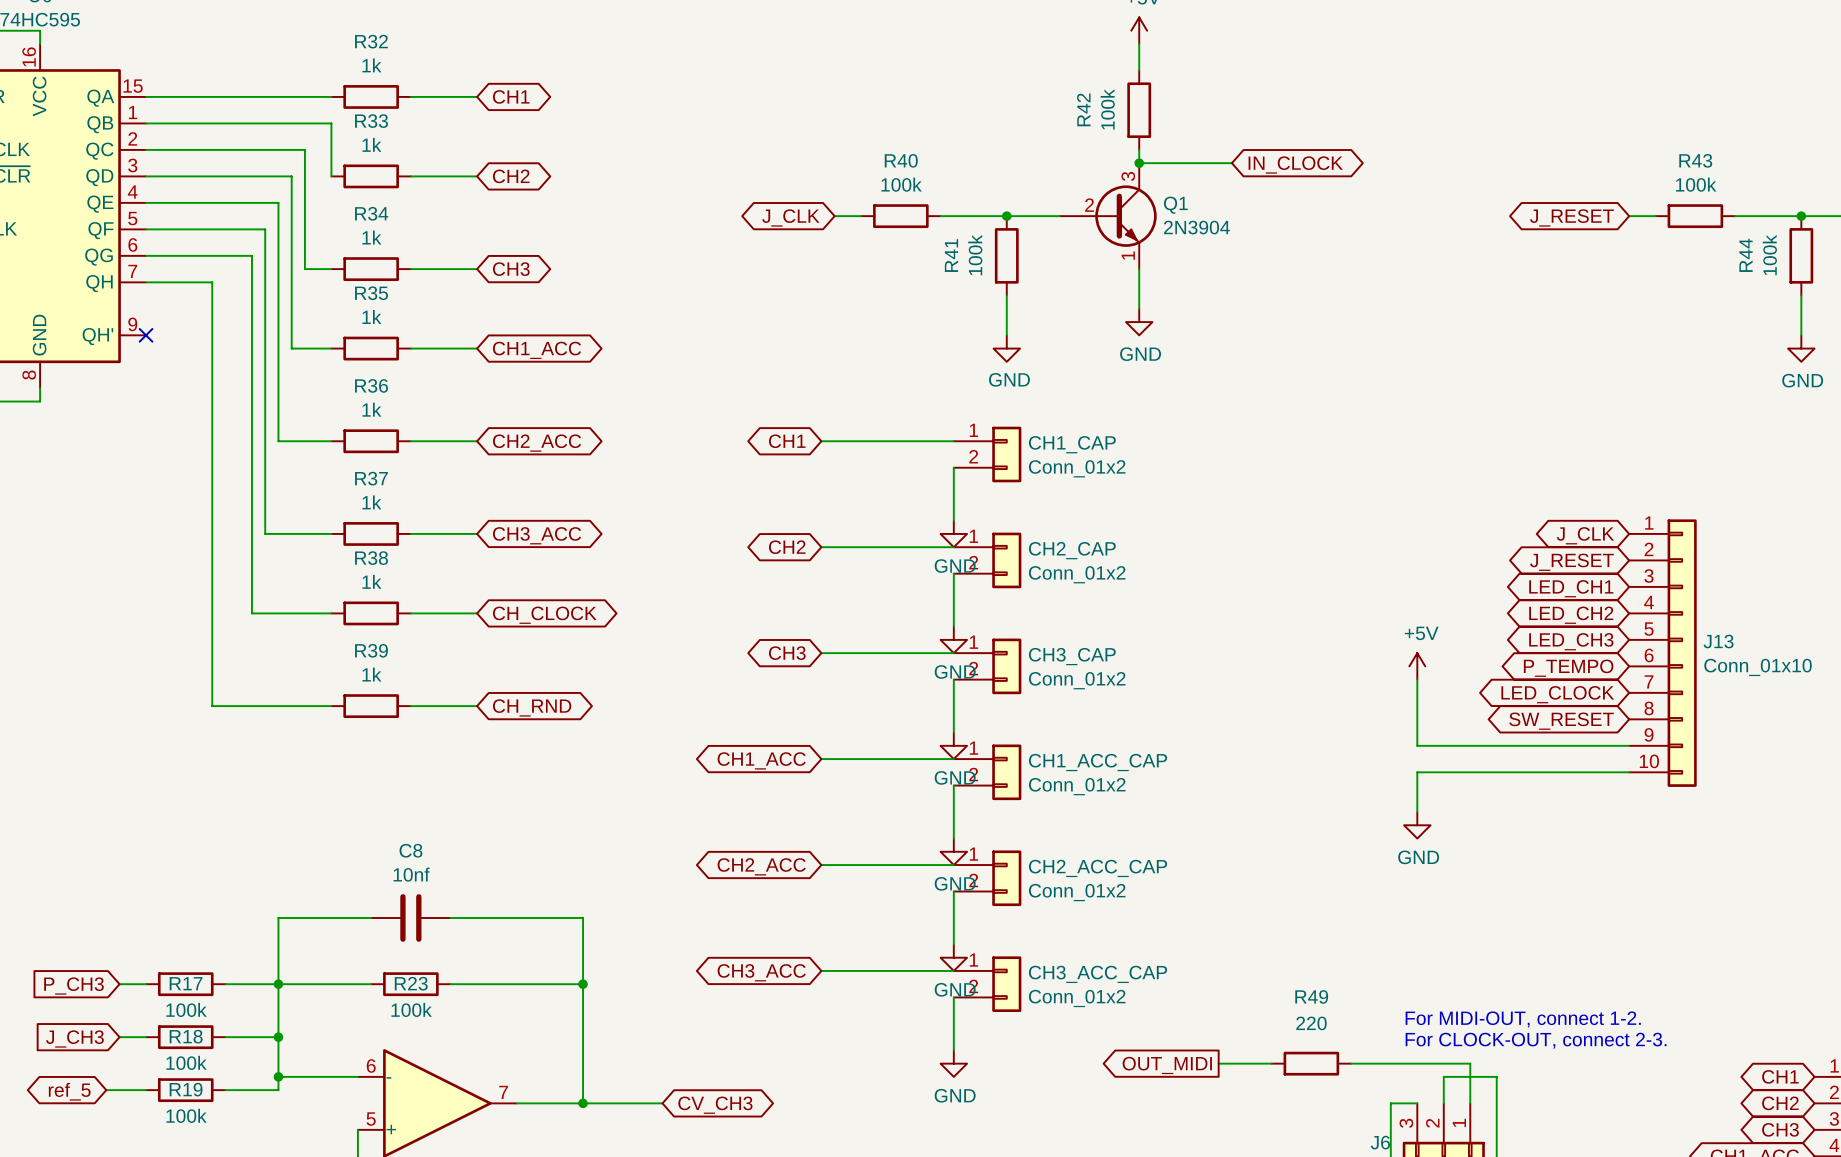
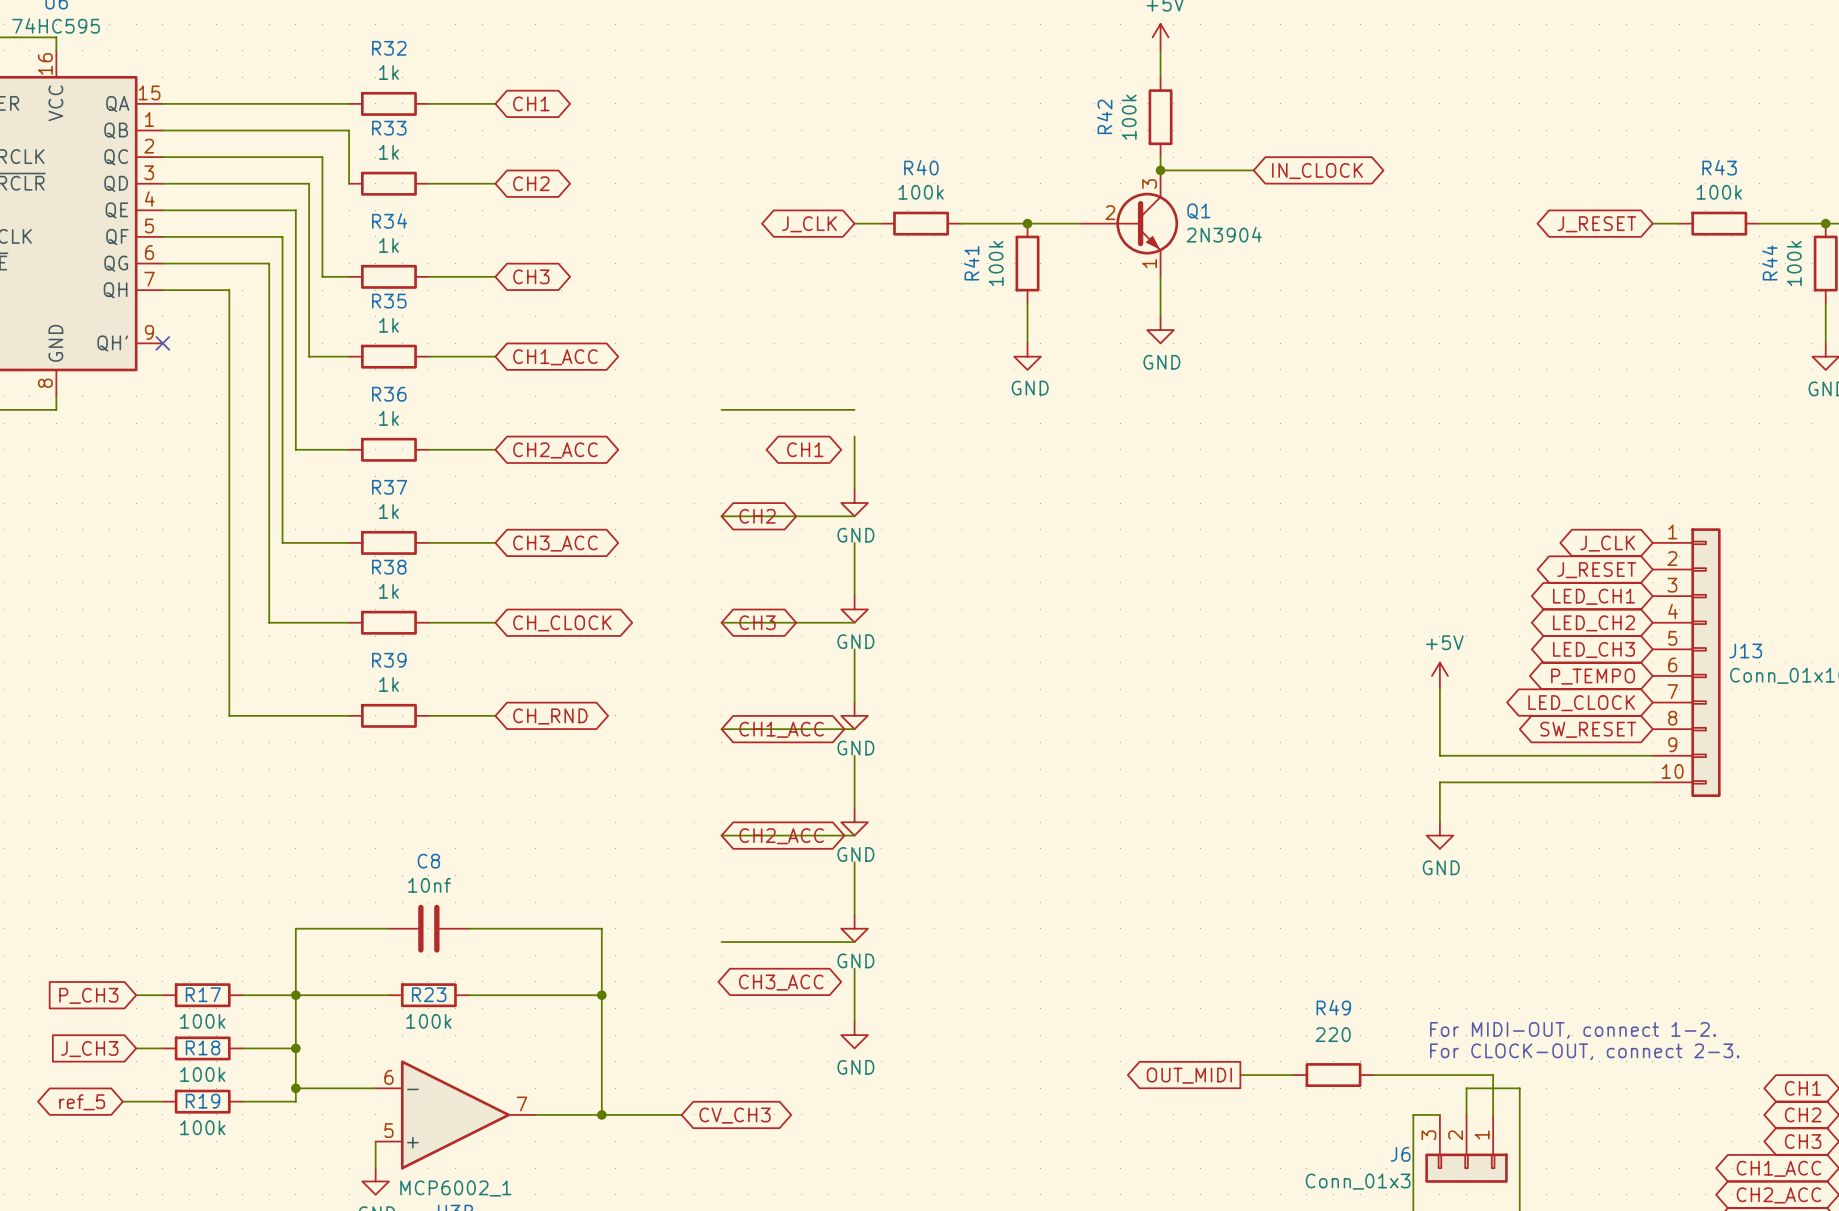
wire: (821, 441) (953, 441) -> (721, 409) (854, 409)
CH1_CAP: Conn_01x2 (987, 454) -> none
wire: (953, 467) (953, 520) -> (854, 436) (854, 489)
power symbol: none -> GND (854, 503)
power symbol: GND (953, 533) -> none
global label rotation: 0° (787, 547) -> 180° (757, 516)
wire: (821, 547) (953, 547) -> (721, 516) (854, 516)
CH2_CAP: Conn_01x2 (987, 560) -> none
wire: (953, 573) (953, 626) -> (854, 542) (854, 596)
power symbol: none -> GND (854, 609)
power symbol: GND (953, 639) -> none
global label rotation: 0° (787, 653) -> 180° (757, 622)
wire: (821, 653) (953, 653) -> (721, 622) (854, 622)
CH3_CAP: Conn_01x2 (987, 666) -> none
wire: (953, 679) (953, 732) -> (854, 649) (854, 702)
power symbol: none -> GND (854, 715)
power symbol: GND (953, 745) -> none
wire: (821, 759) (953, 759) -> (721, 729) (854, 729)
global label rotation: 0° (761, 760) -> 180° (781, 729)
CH1_ACC_CAP: Conn_01x2 (987, 772) -> none
wire: (953, 785) (953, 838) -> (854, 755) (854, 808)
power symbol: none -> GND (854, 822)
power symbol: GND (953, 851) -> none
wire: (821, 865) (953, 865) -> (721, 835) (854, 835)
global label rotation: 0° (761, 866) -> 180° (781, 836)
CH2_ACC_CAP: Conn_01x2 (987, 878) -> none
wire: (953, 891) (953, 944) -> (854, 862) (854, 915)
power symbol: none -> GND (854, 928)
power symbol: GND (953, 957) -> none
wire: (821, 970) (953, 970) -> (721, 942) (854, 942)
CH3_ACC_CAP: Conn_01x2 (987, 984) -> none
wire: (953, 997) (953, 1050) -> (854, 968) (854, 1021)
power symbol: none -> GND (854, 1035)
power symbol: GND (953, 1063) -> none

